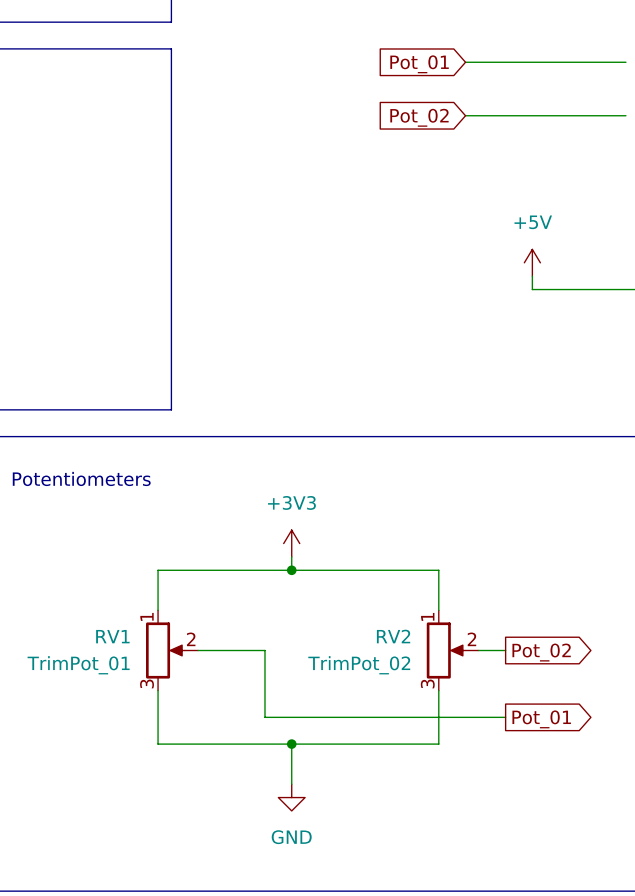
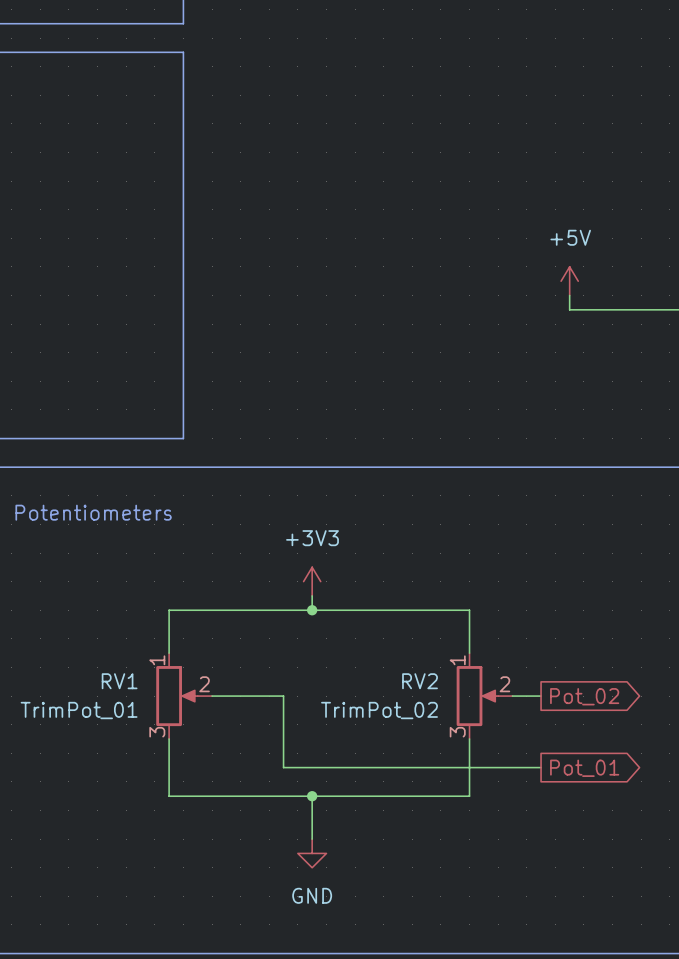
wire: (465, 62) (625, 62) -> none
global label: Pot_01 (419, 64) -> none
wire: (465, 115) (625, 115) -> none
global label: Pot_02 (419, 117) -> none

